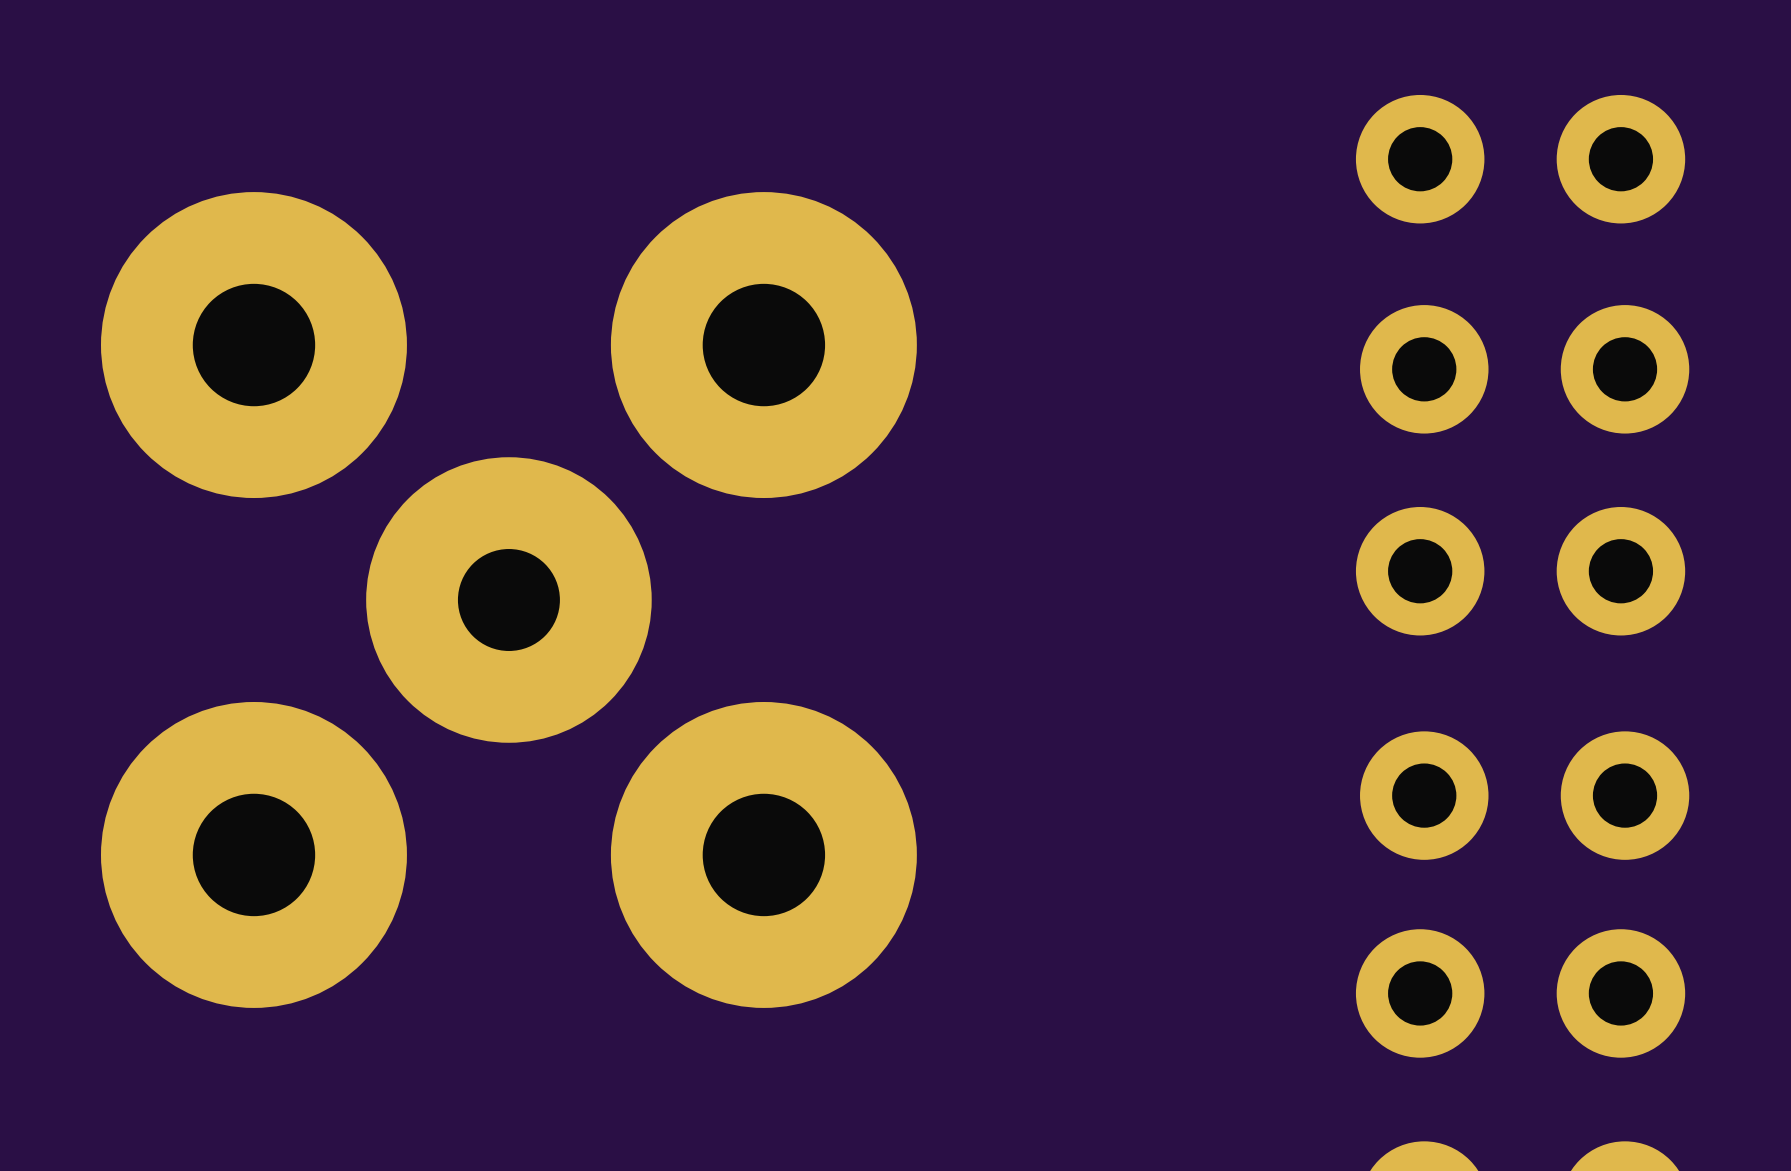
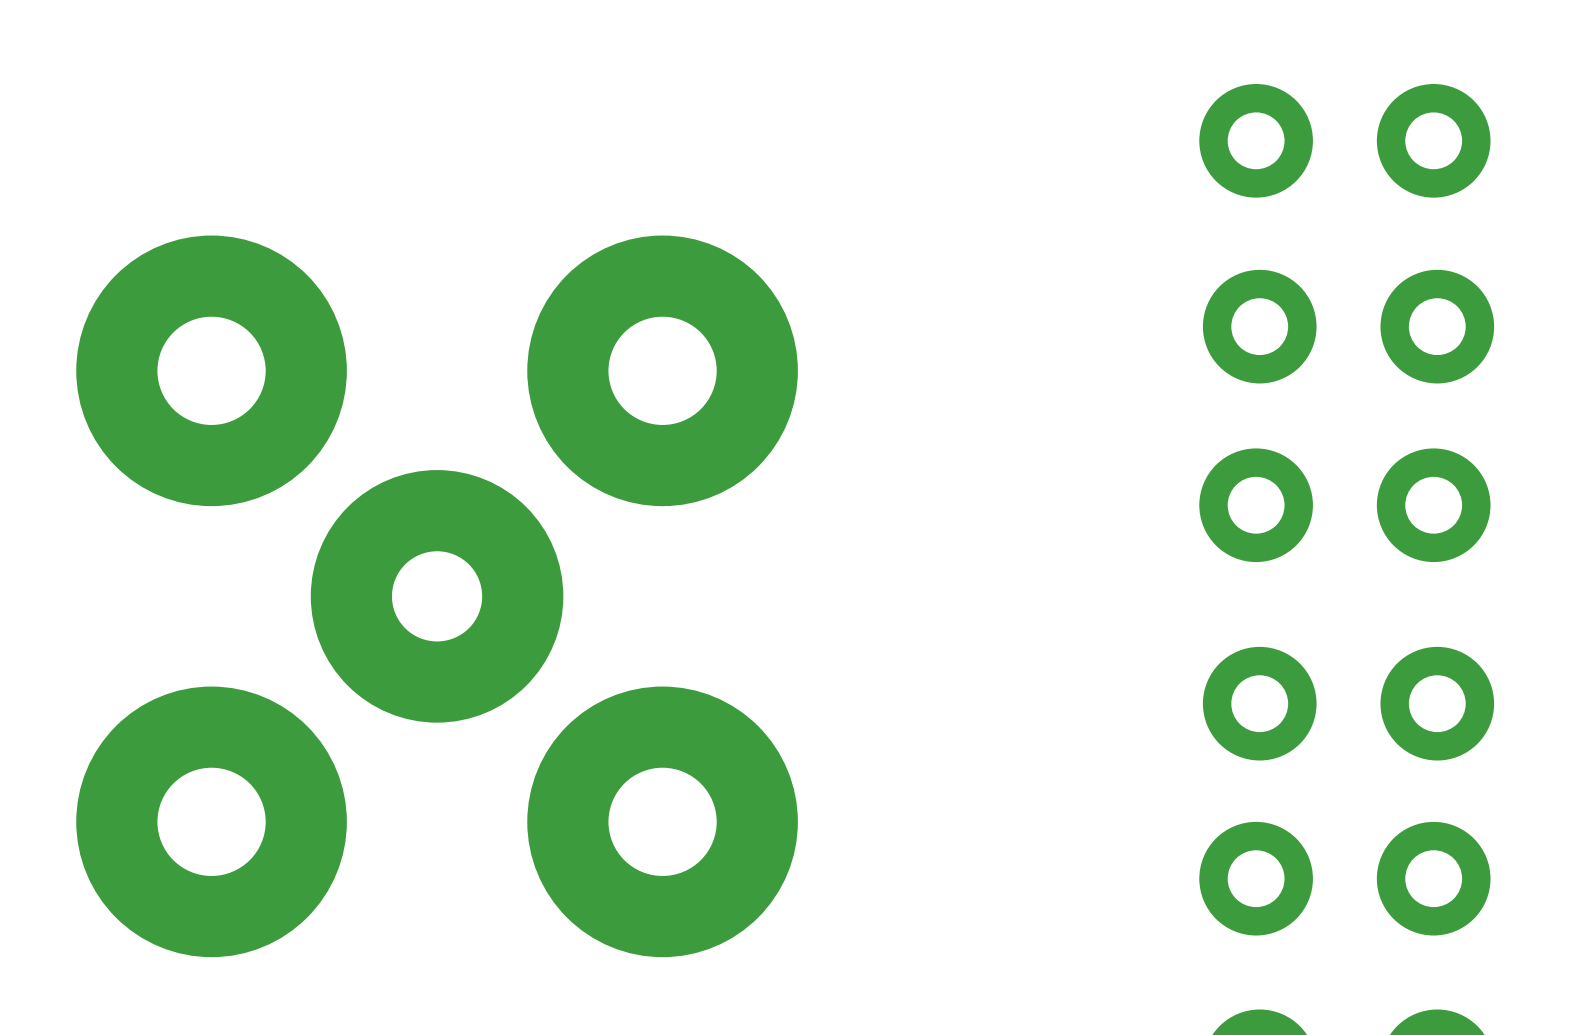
part position: (508, 600) -> (437, 596)

